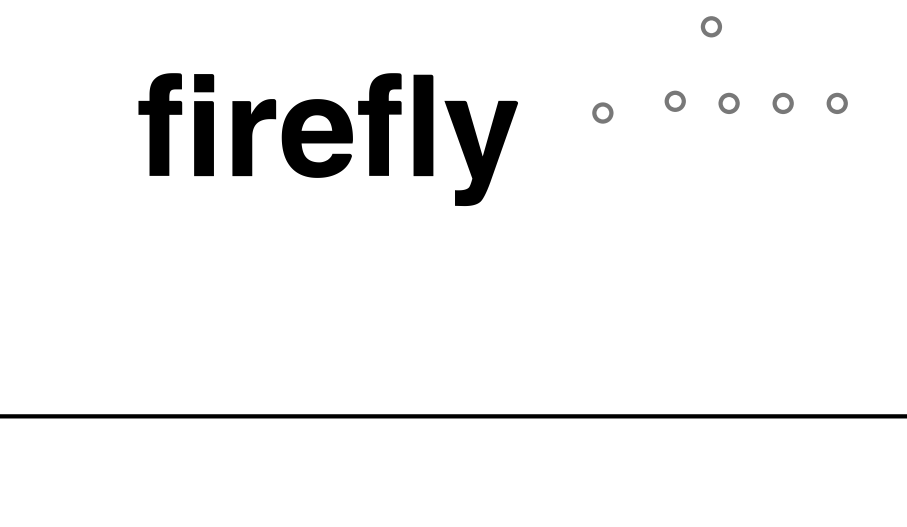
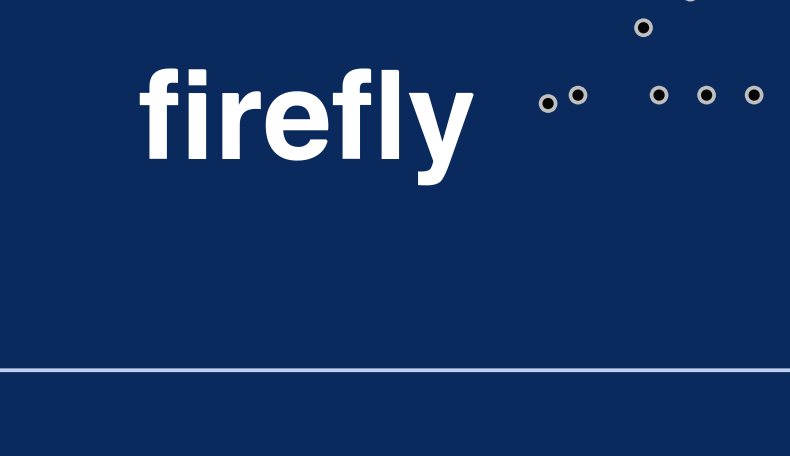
via position: (675, 101) -> (578, 95)

